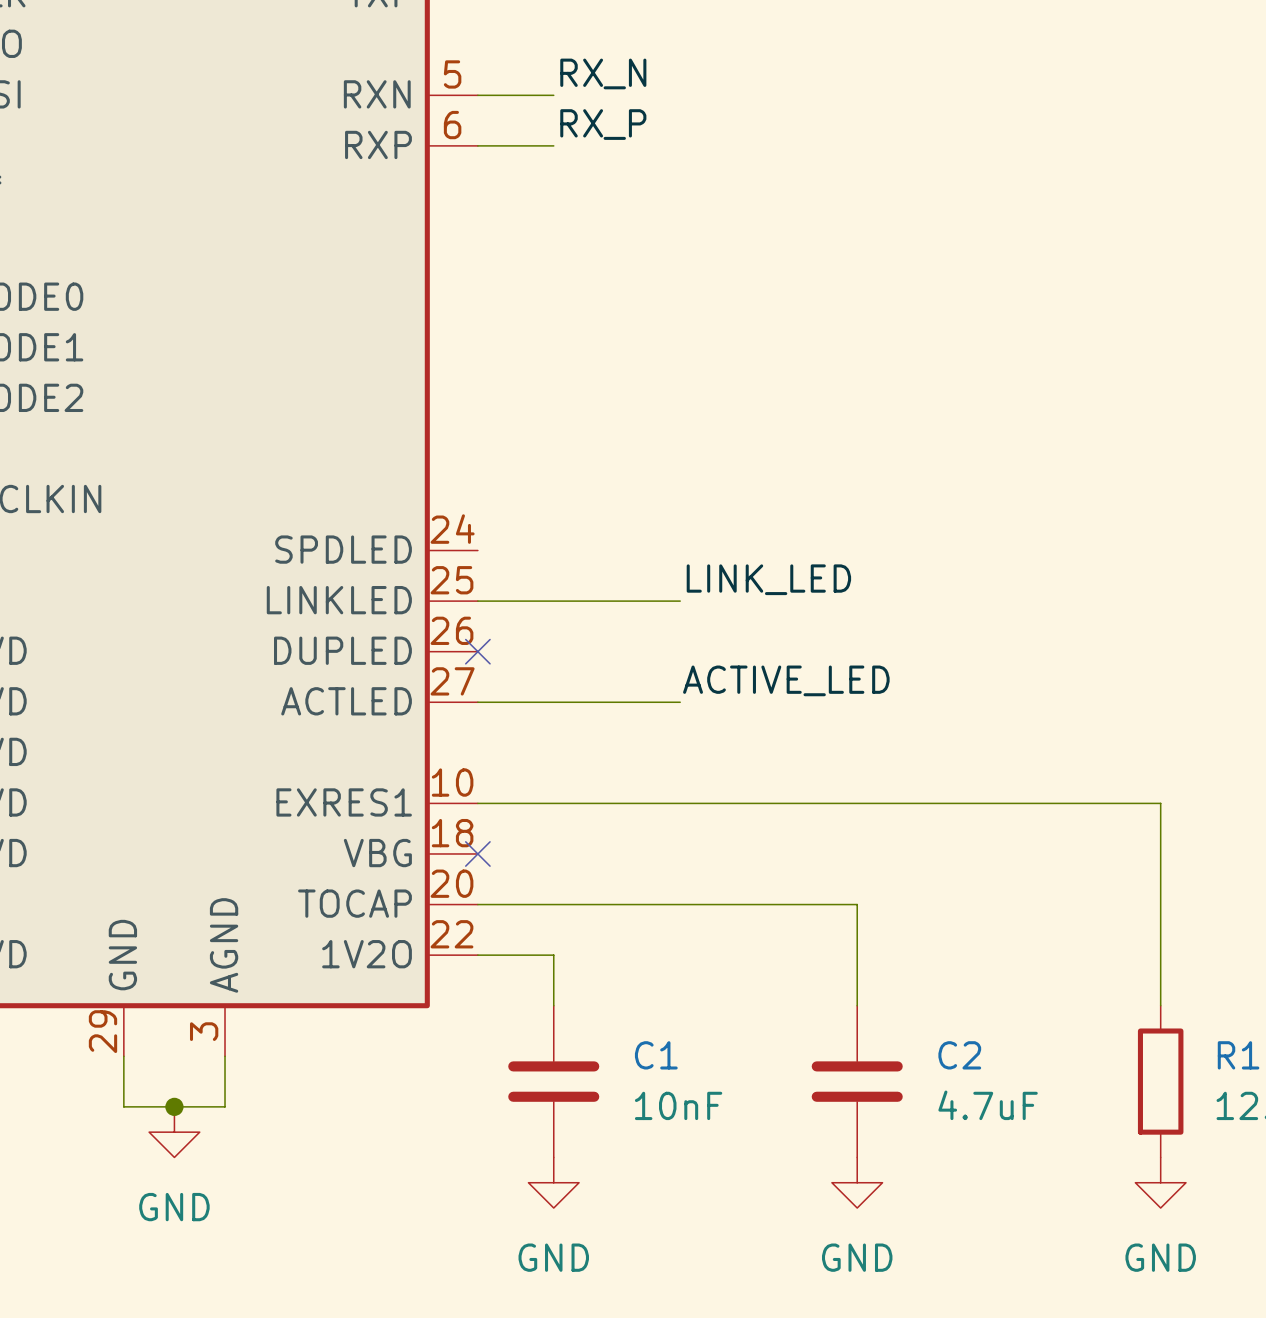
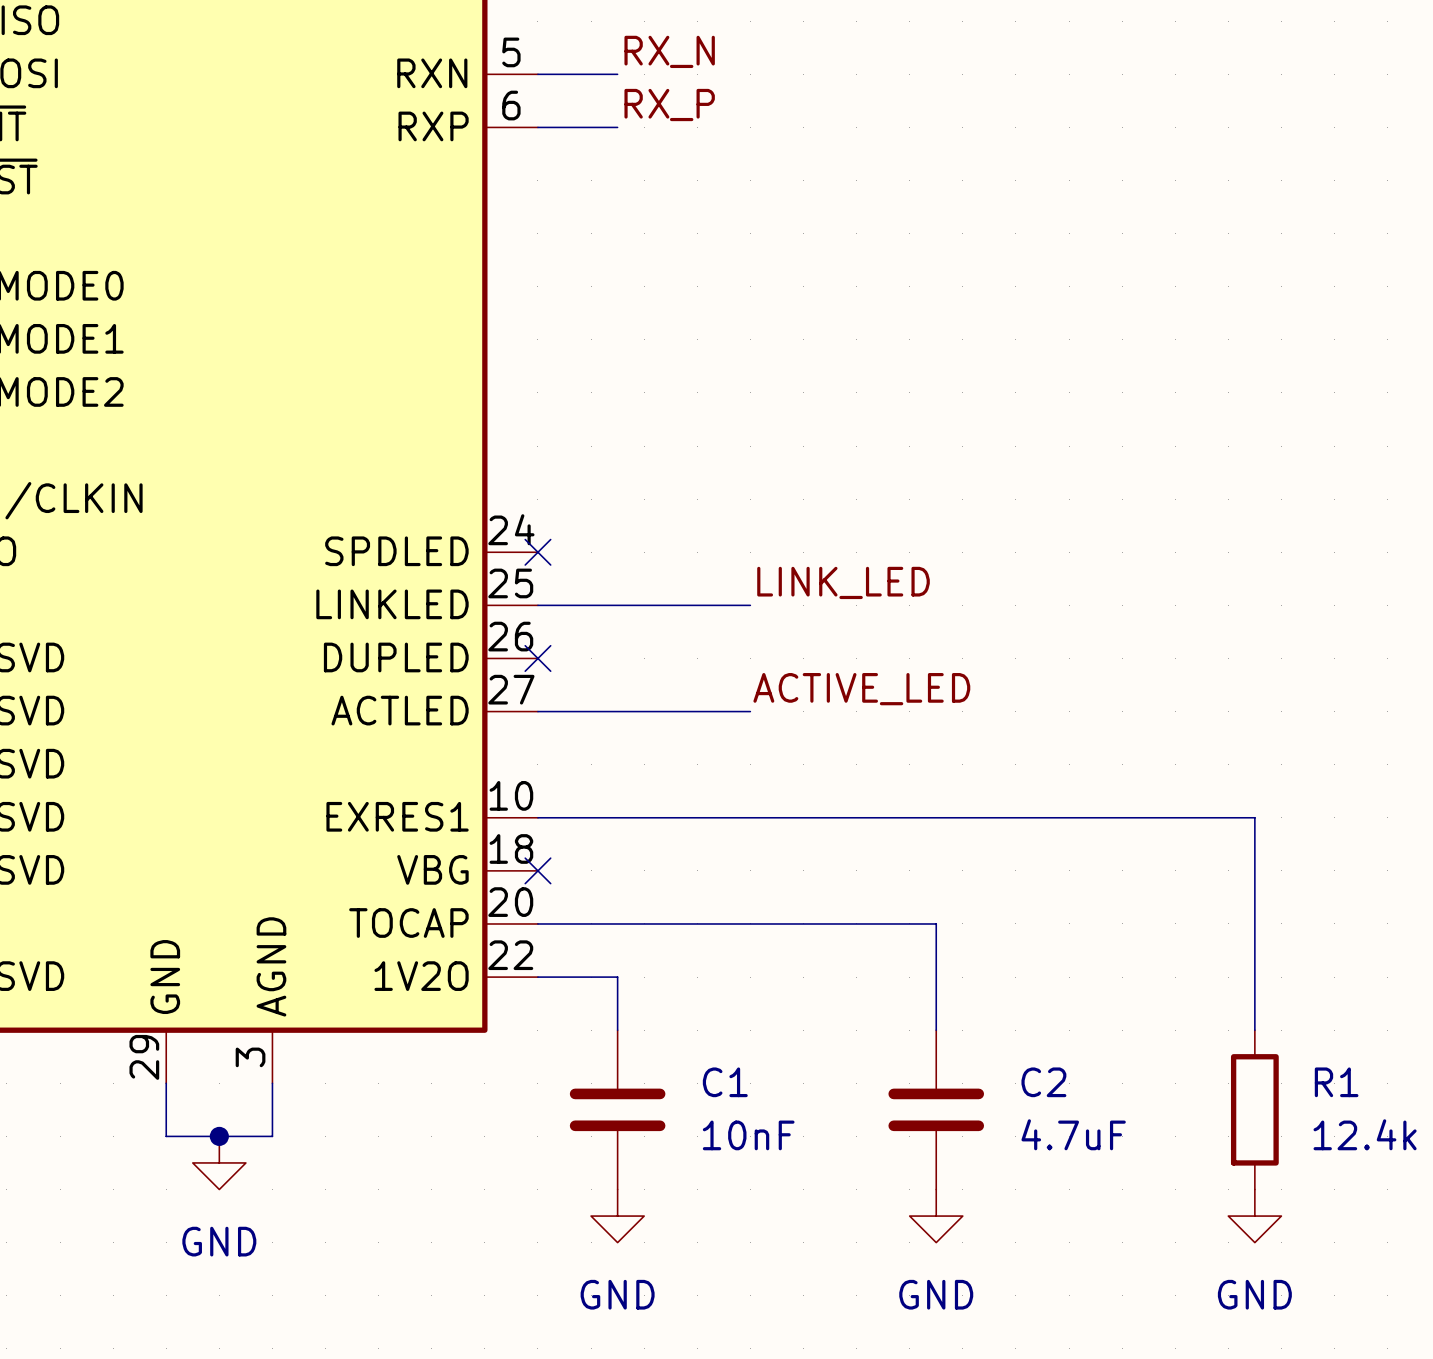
no-connect mark: none -> (537, 552)

